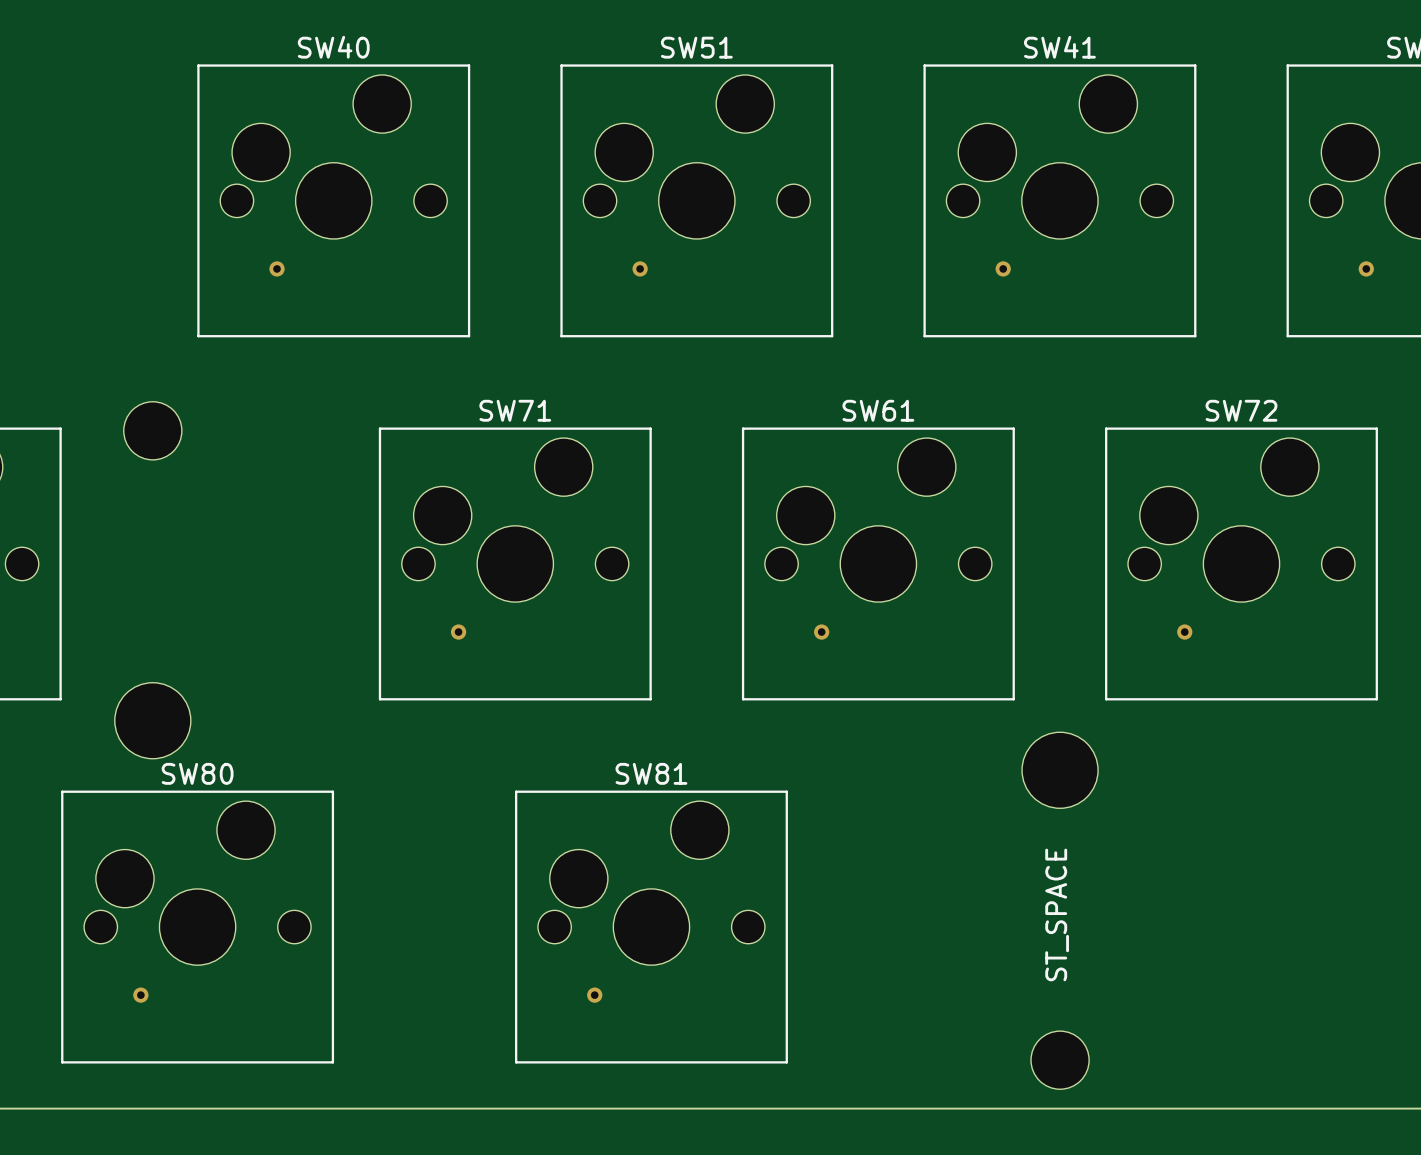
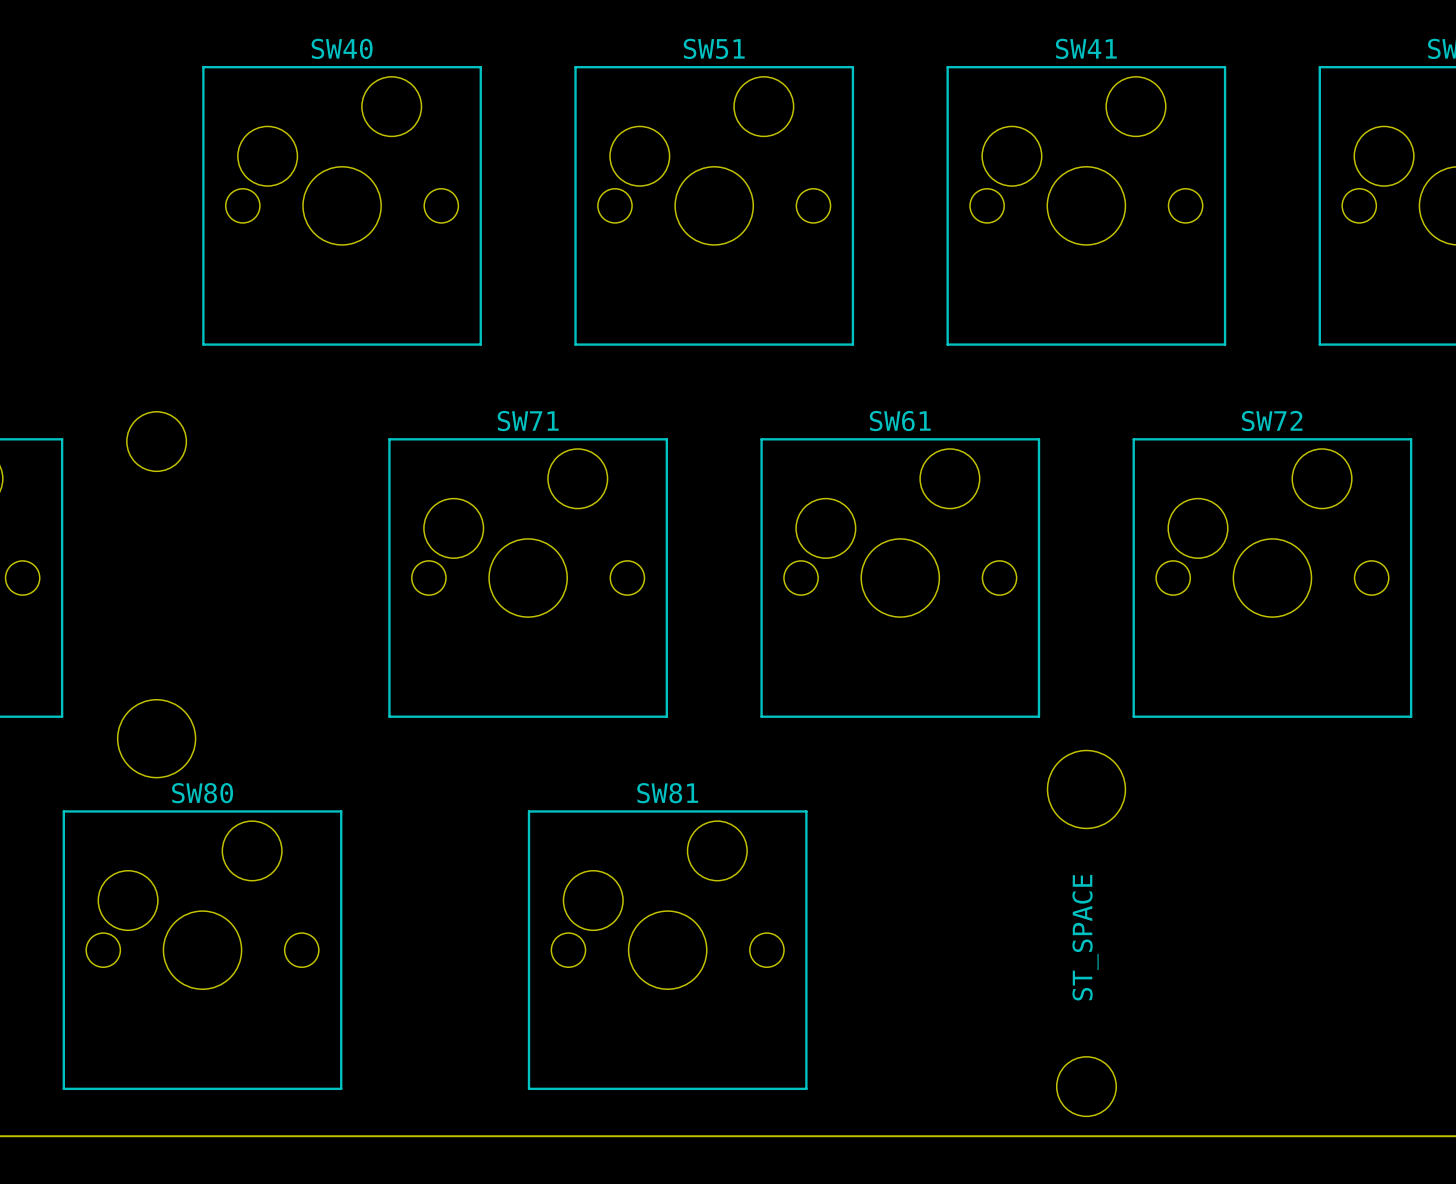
via: (277, 268) -> none
via: (640, 268) -> none
via: (1003, 268) -> none
via: (1366, 268) -> none
via: (458, 632) -> none
via: (821, 632) -> none
via: (1184, 632) -> none
via: (140, 995) -> none
via: (594, 995) -> none

